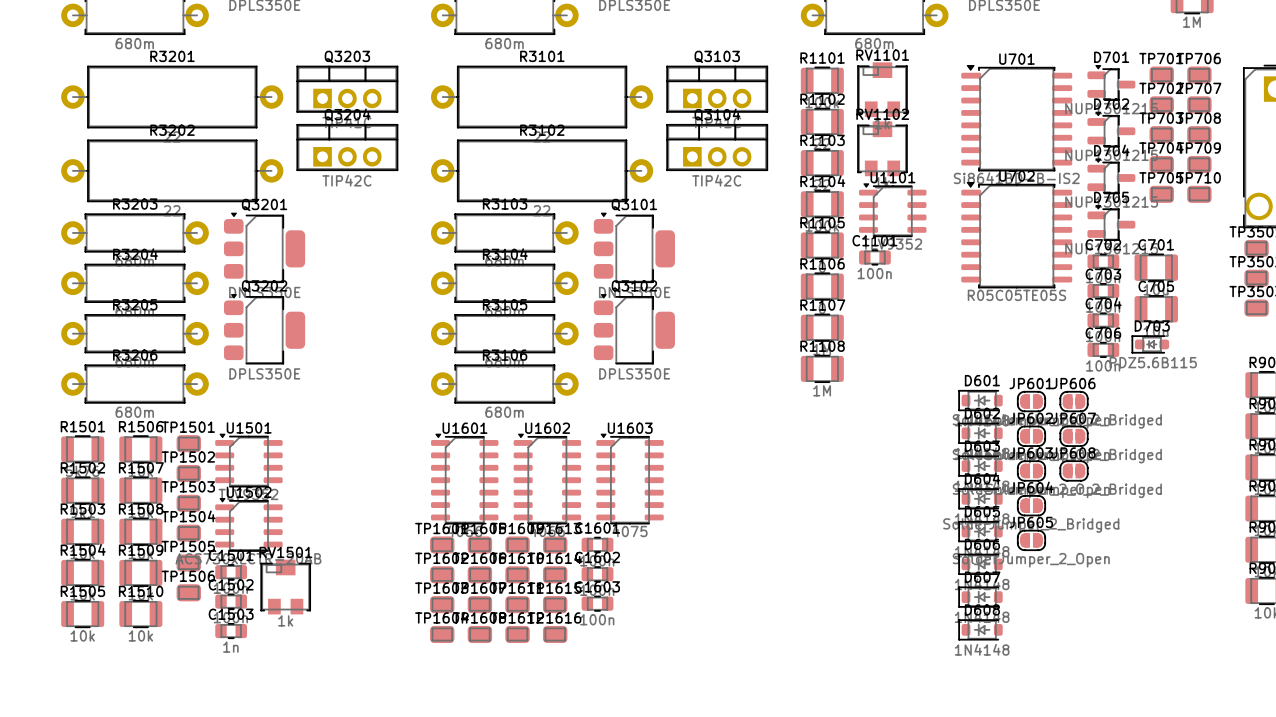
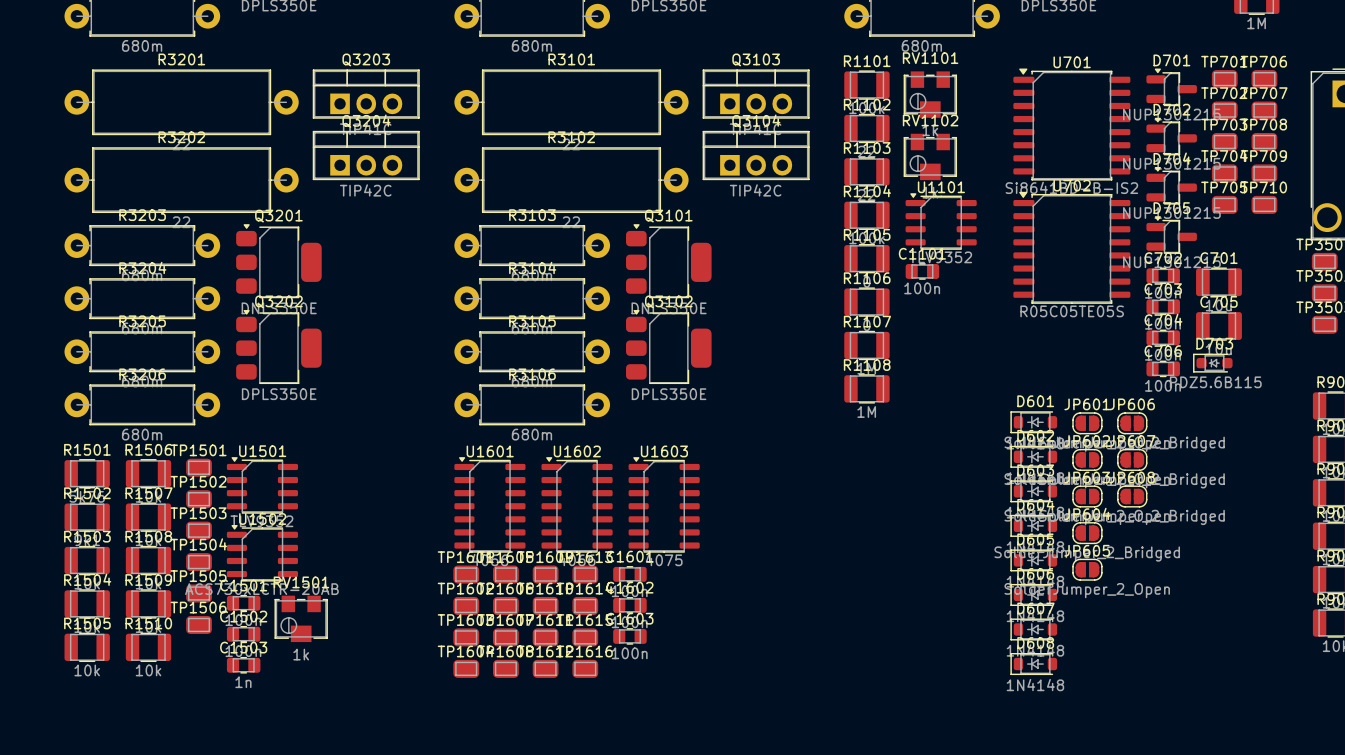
RV1101 footprint: [857, 62, 908, 118] -> [903, 71, 957, 118]
RV1102 footprint: [857, 121, 908, 177] -> [903, 133, 957, 181]
RV1501 footprint: [260, 559, 311, 615] -> [274, 595, 328, 643]

